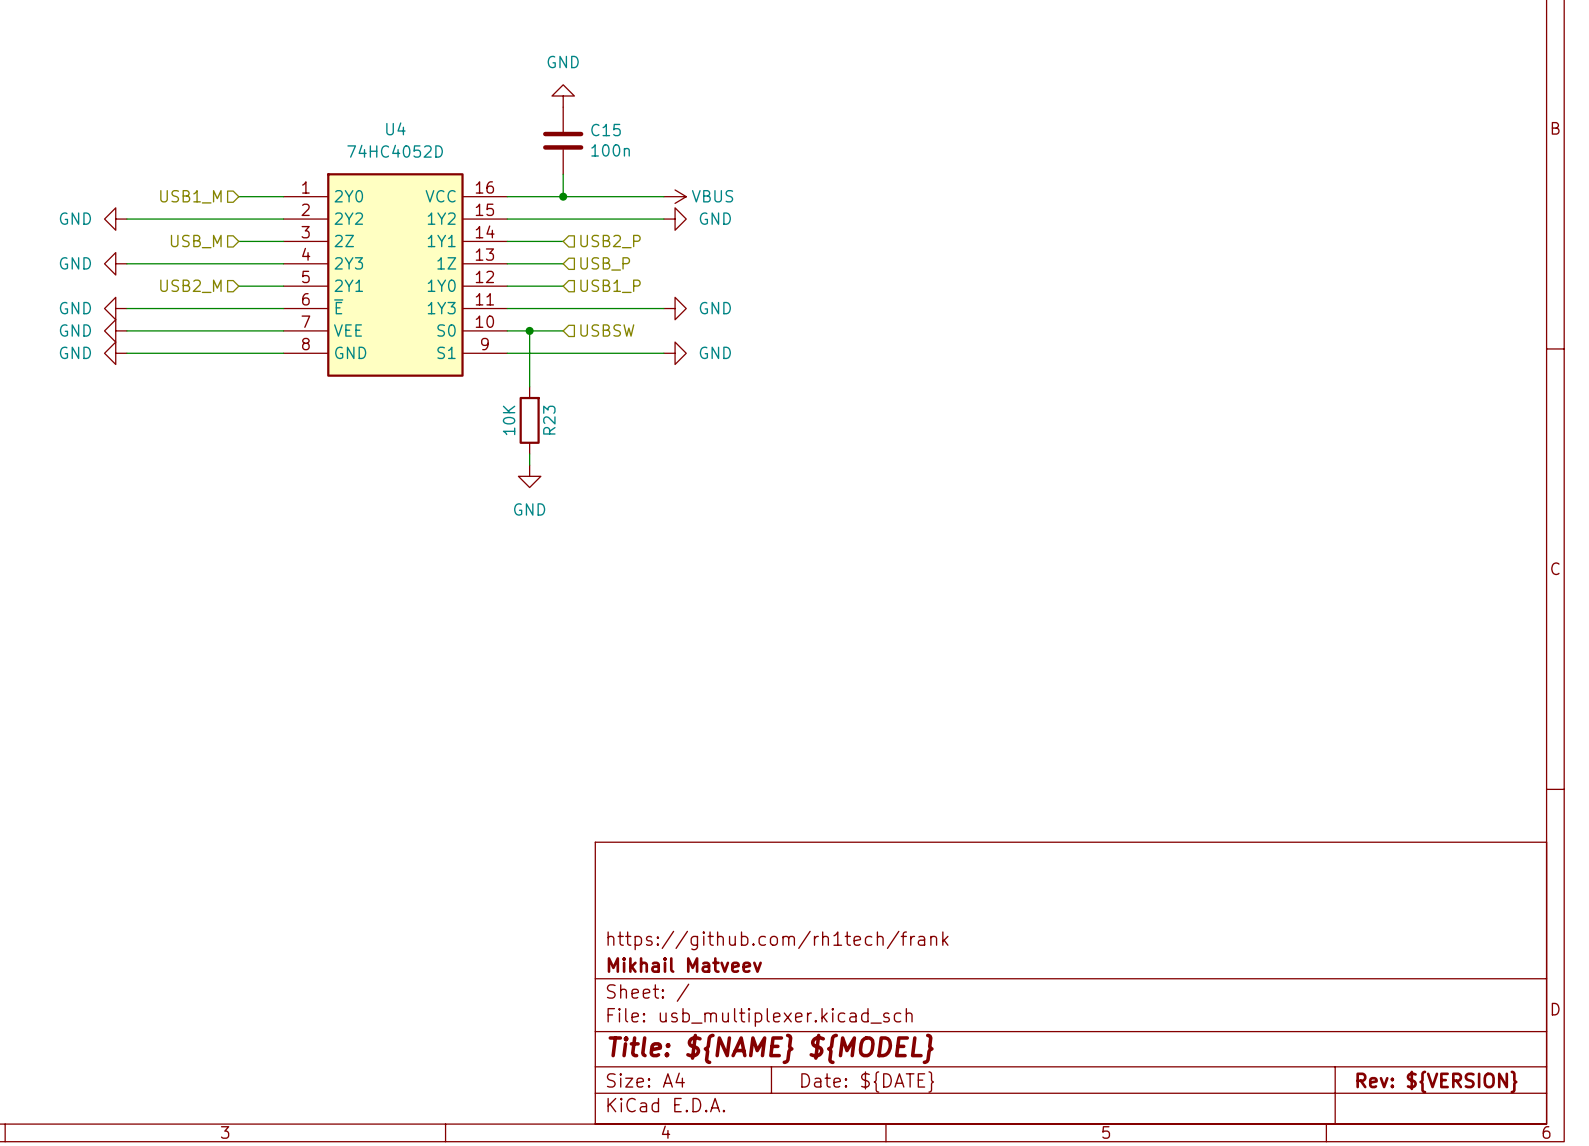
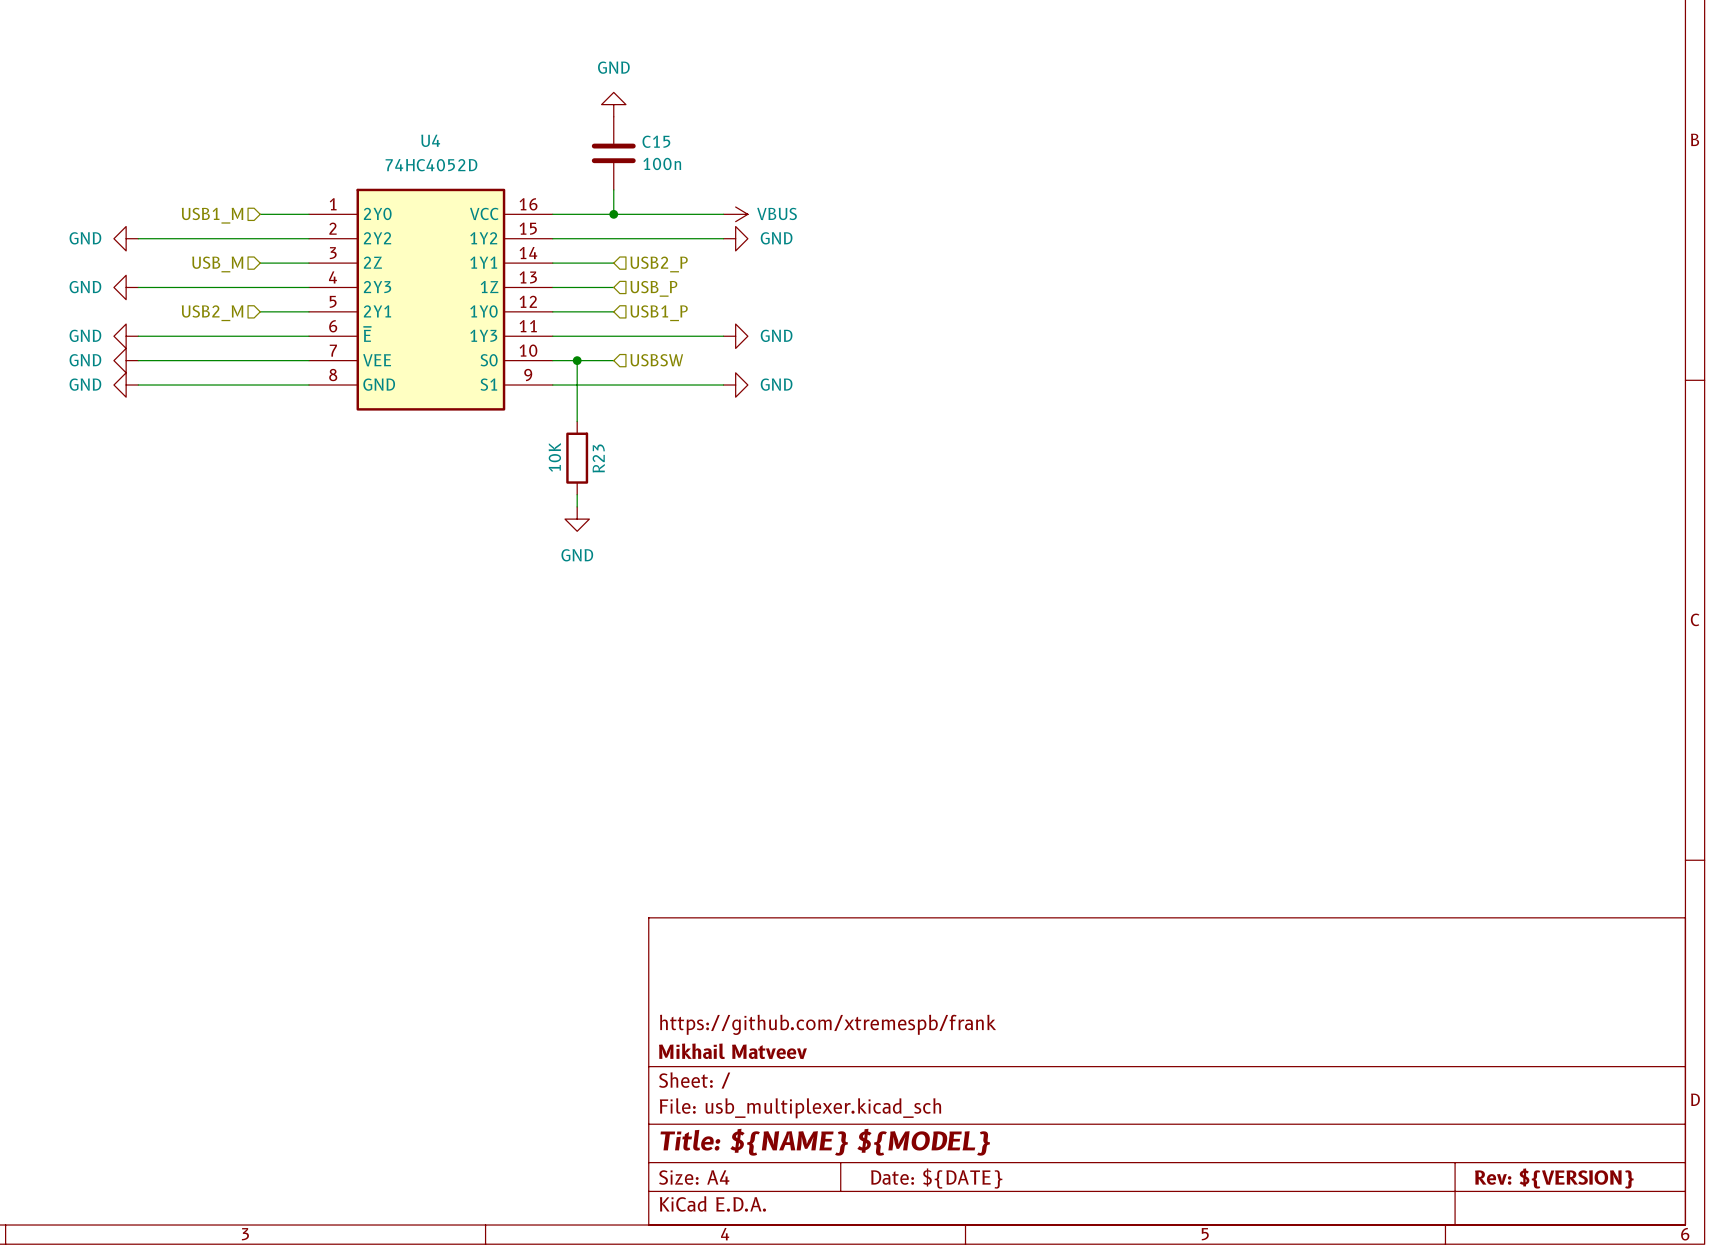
title block: https://github.com/rh1tech/frank (778, 940) -> https://github.com/xtremespb/frank (828, 1024)

